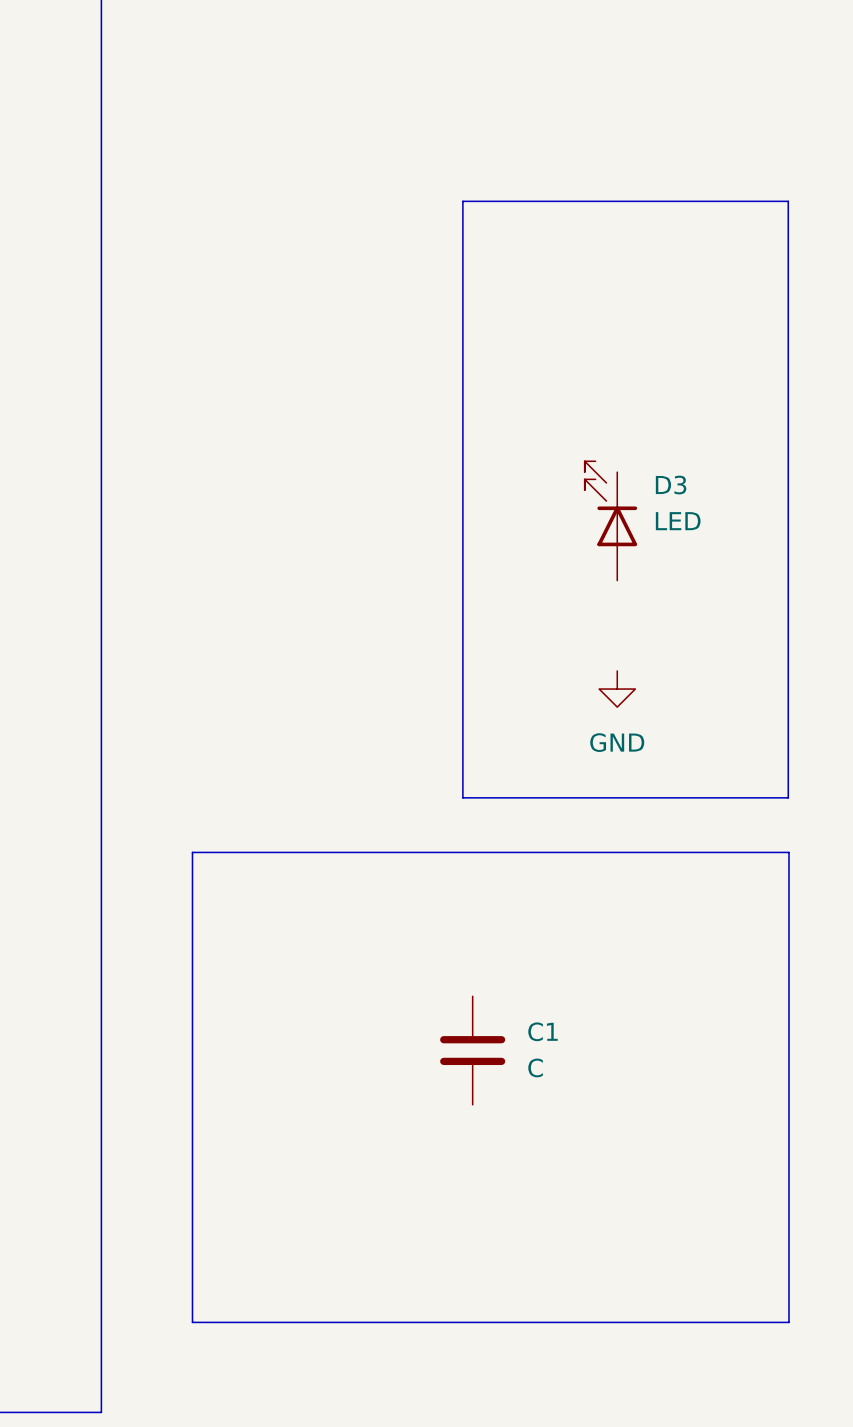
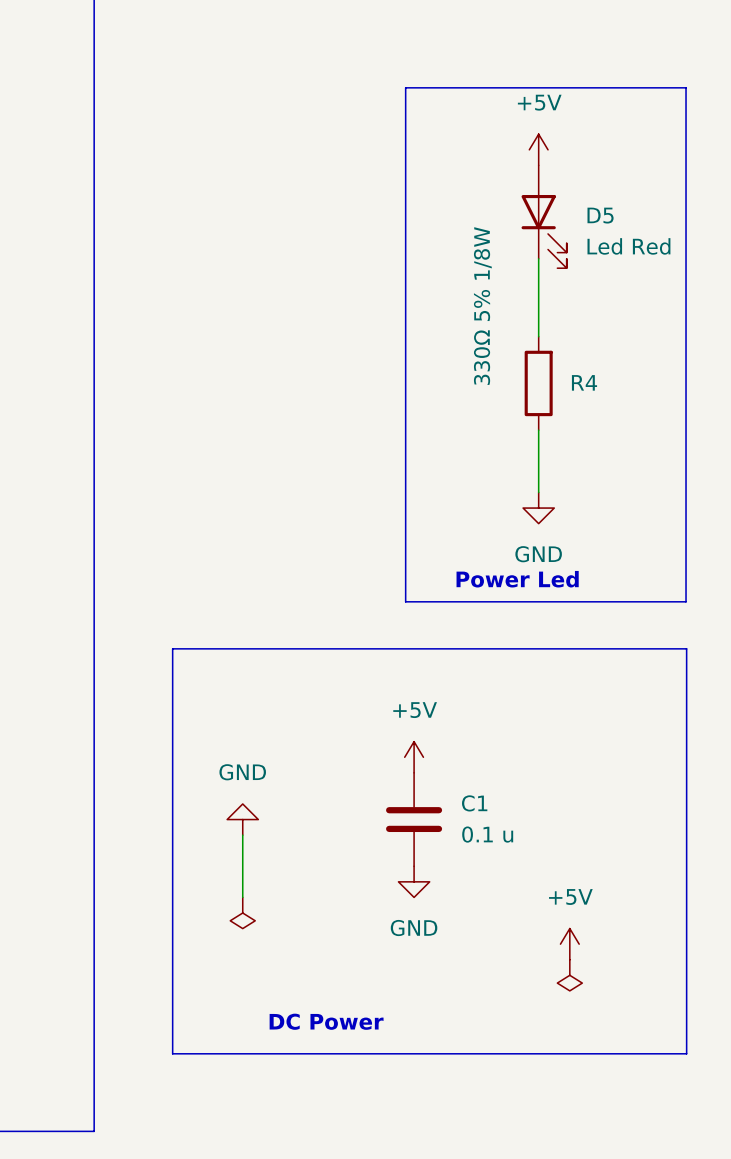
power symbol: none -> +5V (538, 149)
D5: none -> Led Red (544, 216)
wire: none -> (538, 258) (538, 336)
D3: LED (610, 520) -> none
R4: none -> 330Ω 5% 1/8W (538, 383)
wire: none -> (538, 430) (538, 492)
text: none -> Power Led (517, 579)
power symbol: none -> +5V (414, 757)
power symbol: none -> GND (242, 819)
C1 value: C (535, 1067) -> 0.1 u (487, 834)
wire: none -> (242, 835) (242, 897)
power symbol: none -> GND (414, 881)
power symbol: none -> (242, 913)
power symbol: none -> +5V (569, 944)
power symbol: none -> (569, 975)
text: none -> DC Power (326, 1021)

